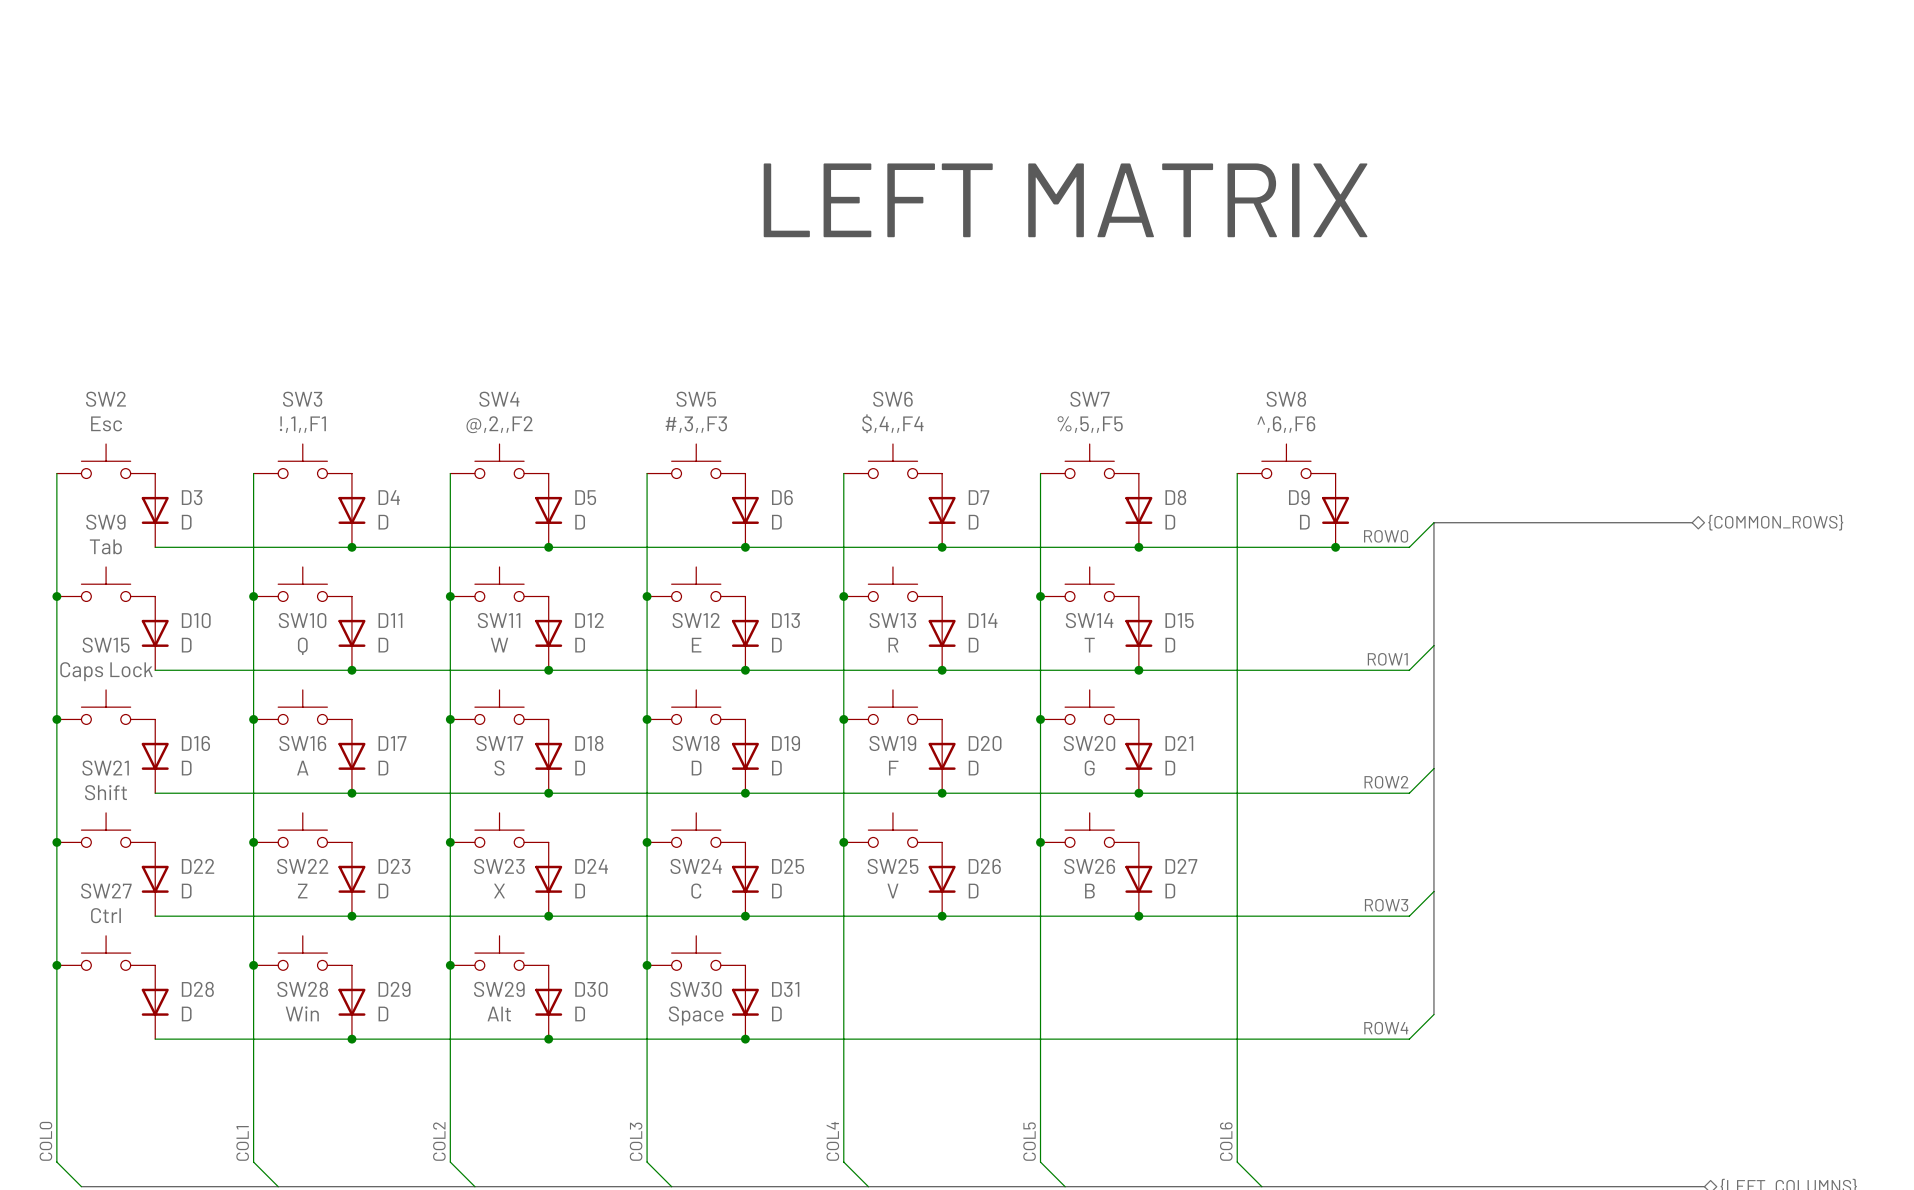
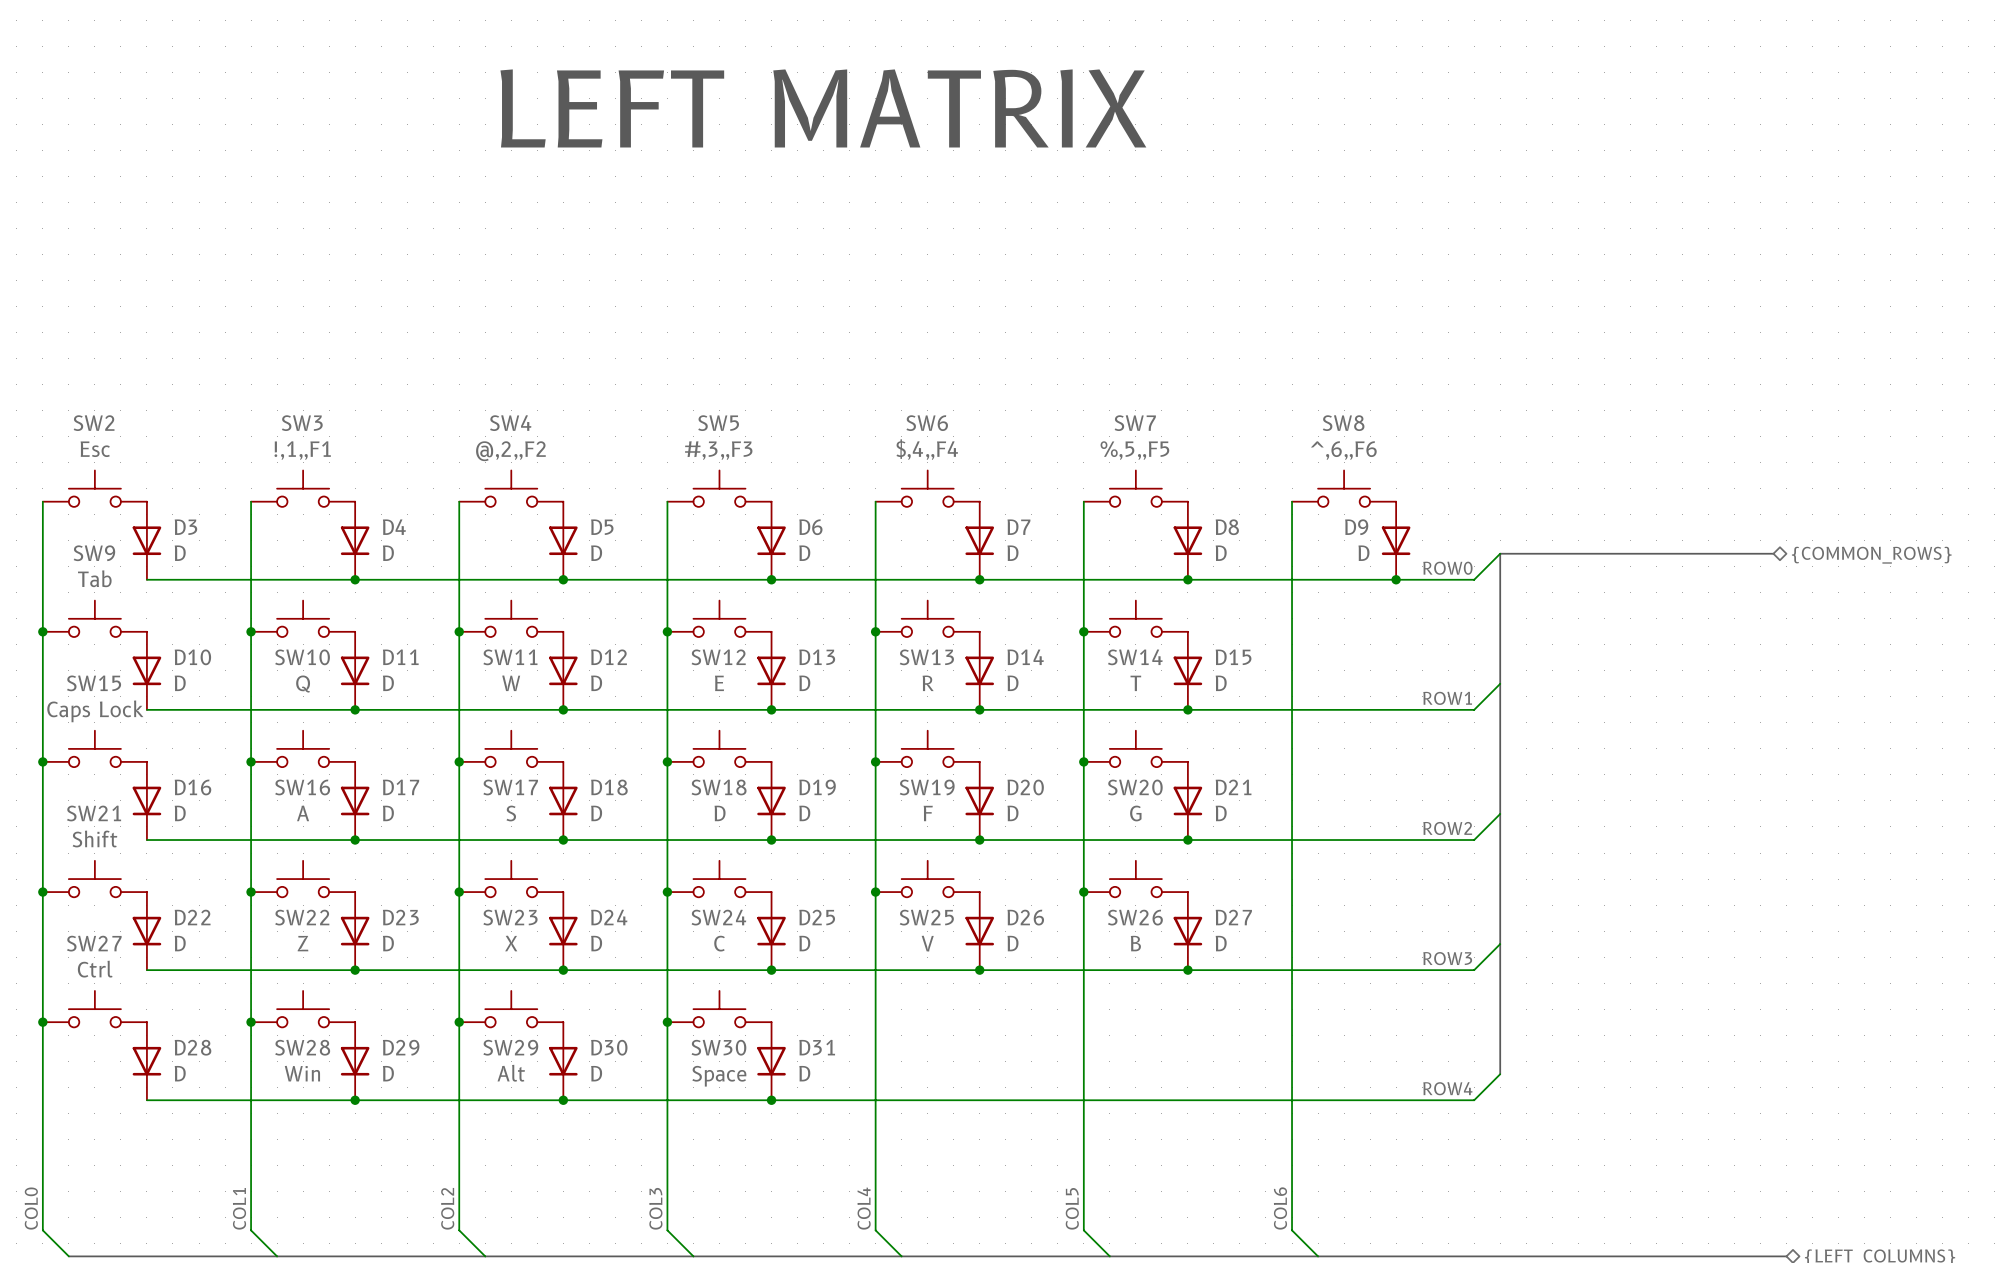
text: none -> LEFT MATRIX (823, 108)
text: LEFT MATRIX (1065, 200) -> none

